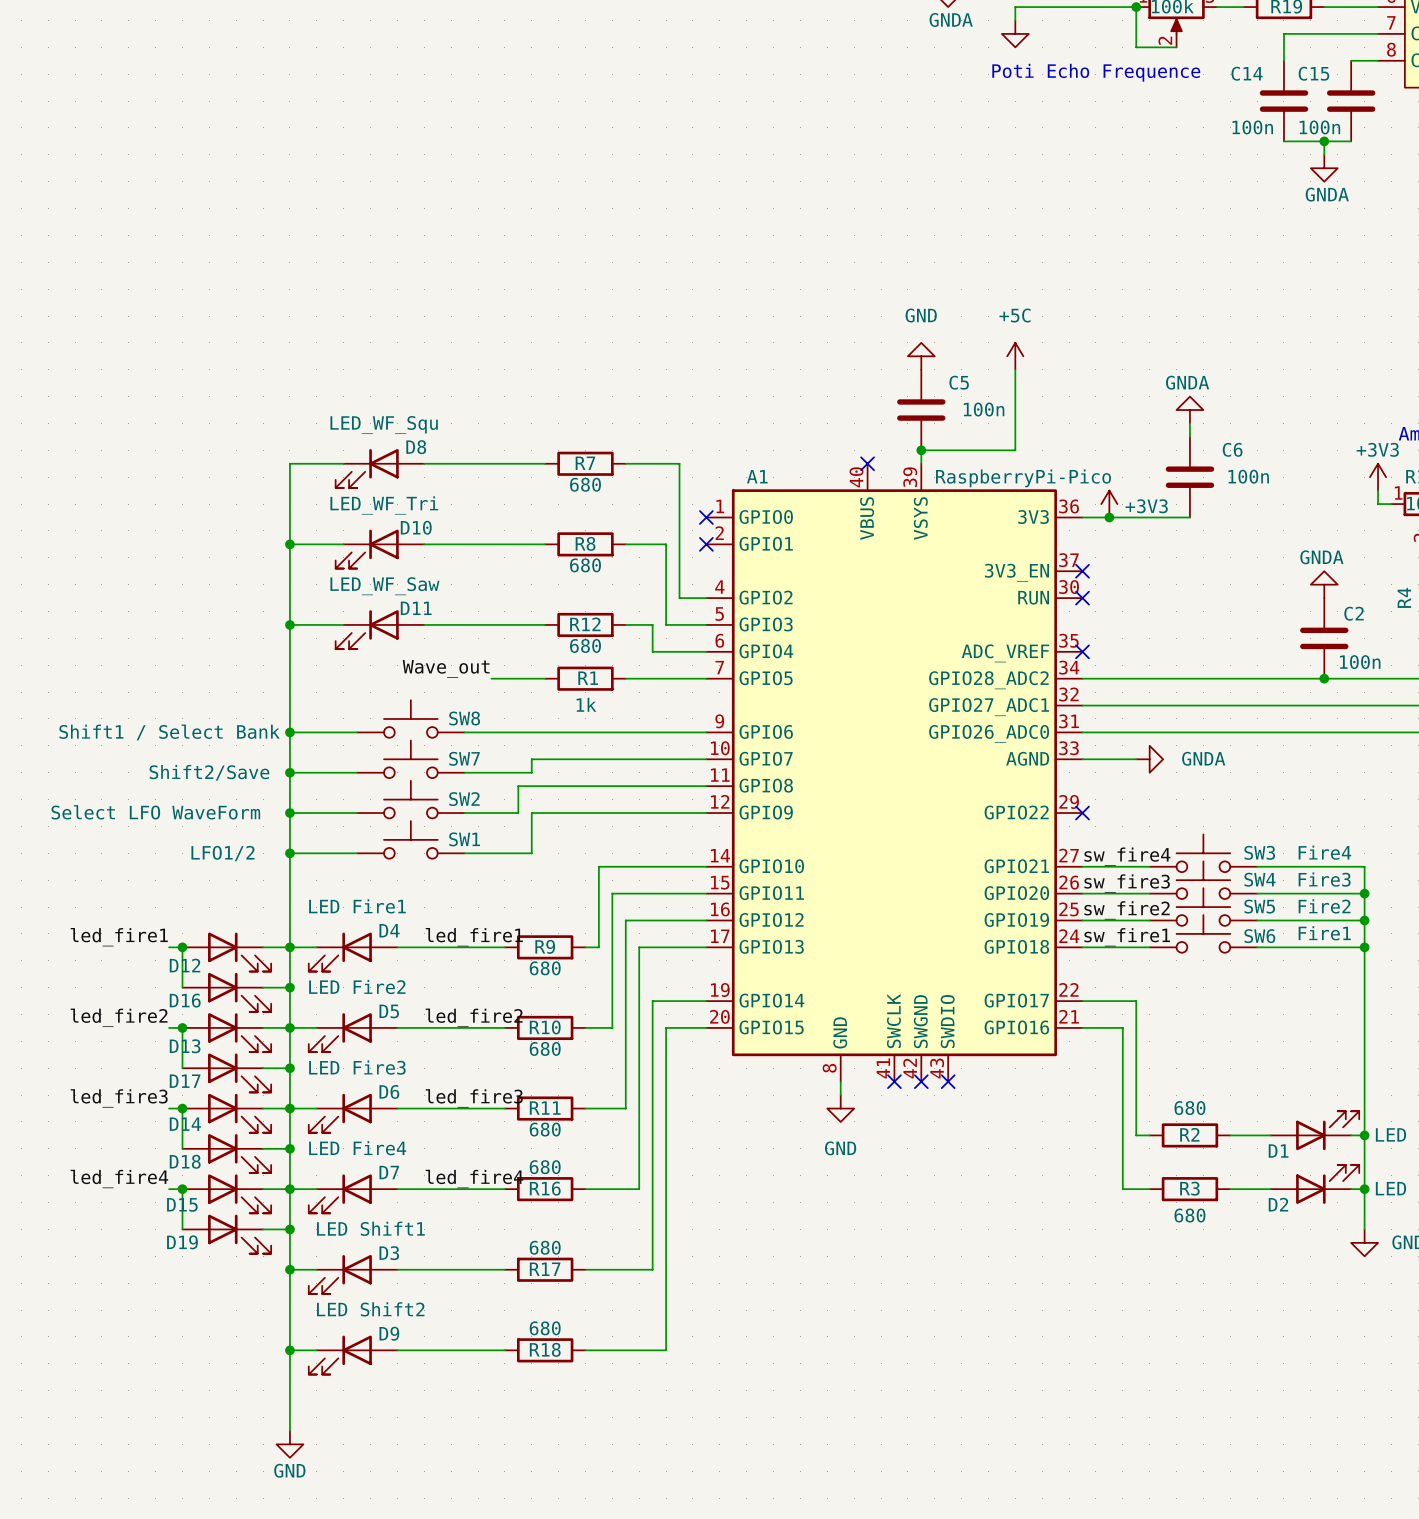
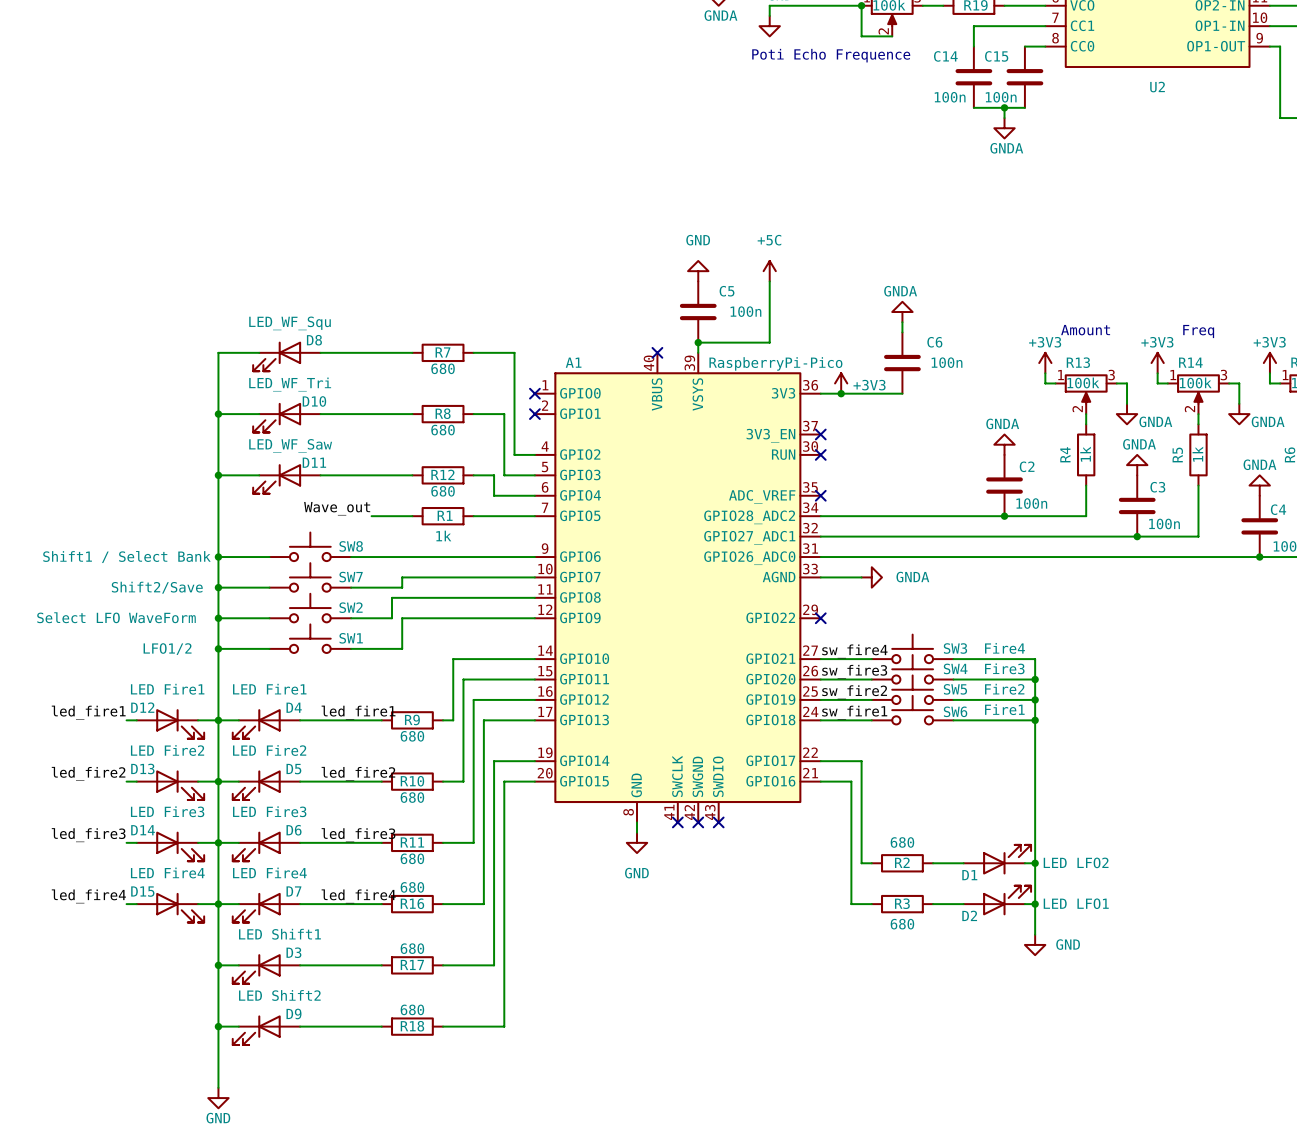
D12 value: none -> LED Fire1 (167, 689)
wire: (182, 947) (182, 987) -> none
junction: (182, 947) -> none
D12 name position: D12 (185, 965) -> D12 (142, 707)
D13 value: none -> LED Fire2 (167, 750)
wire: (263, 987) (289, 987) -> none
junction: (289, 987) -> none
D16: (226, 992) -> none
wire: (182, 1027) (182, 1068) -> none
junction: (182, 1027) -> none
D13 name position: D13 (185, 1046) -> D13 (142, 768)
D14 value: none -> LED Fire3 (167, 811)
wire: (263, 1068) (289, 1068) -> none
junction: (289, 1068) -> none
D17: (226, 1072) -> none
wire: (182, 1108) (182, 1148) -> none
junction: (182, 1108) -> none
D14 name position: D14 (185, 1124) -> D14 (143, 830)
D15 value: none -> LED Fire4 (167, 872)
wire: (263, 1148) (289, 1148) -> none
junction: (289, 1148) -> none
D18: (226, 1153) -> none
wire: (182, 1189) (182, 1229) -> none
junction: (182, 1189) -> none
D15 name position: D15 (182, 1204) -> D15 (142, 891)
wire: (263, 1229) (289, 1229) -> none
junction: (289, 1229) -> none
D19: (226, 1234) -> none

